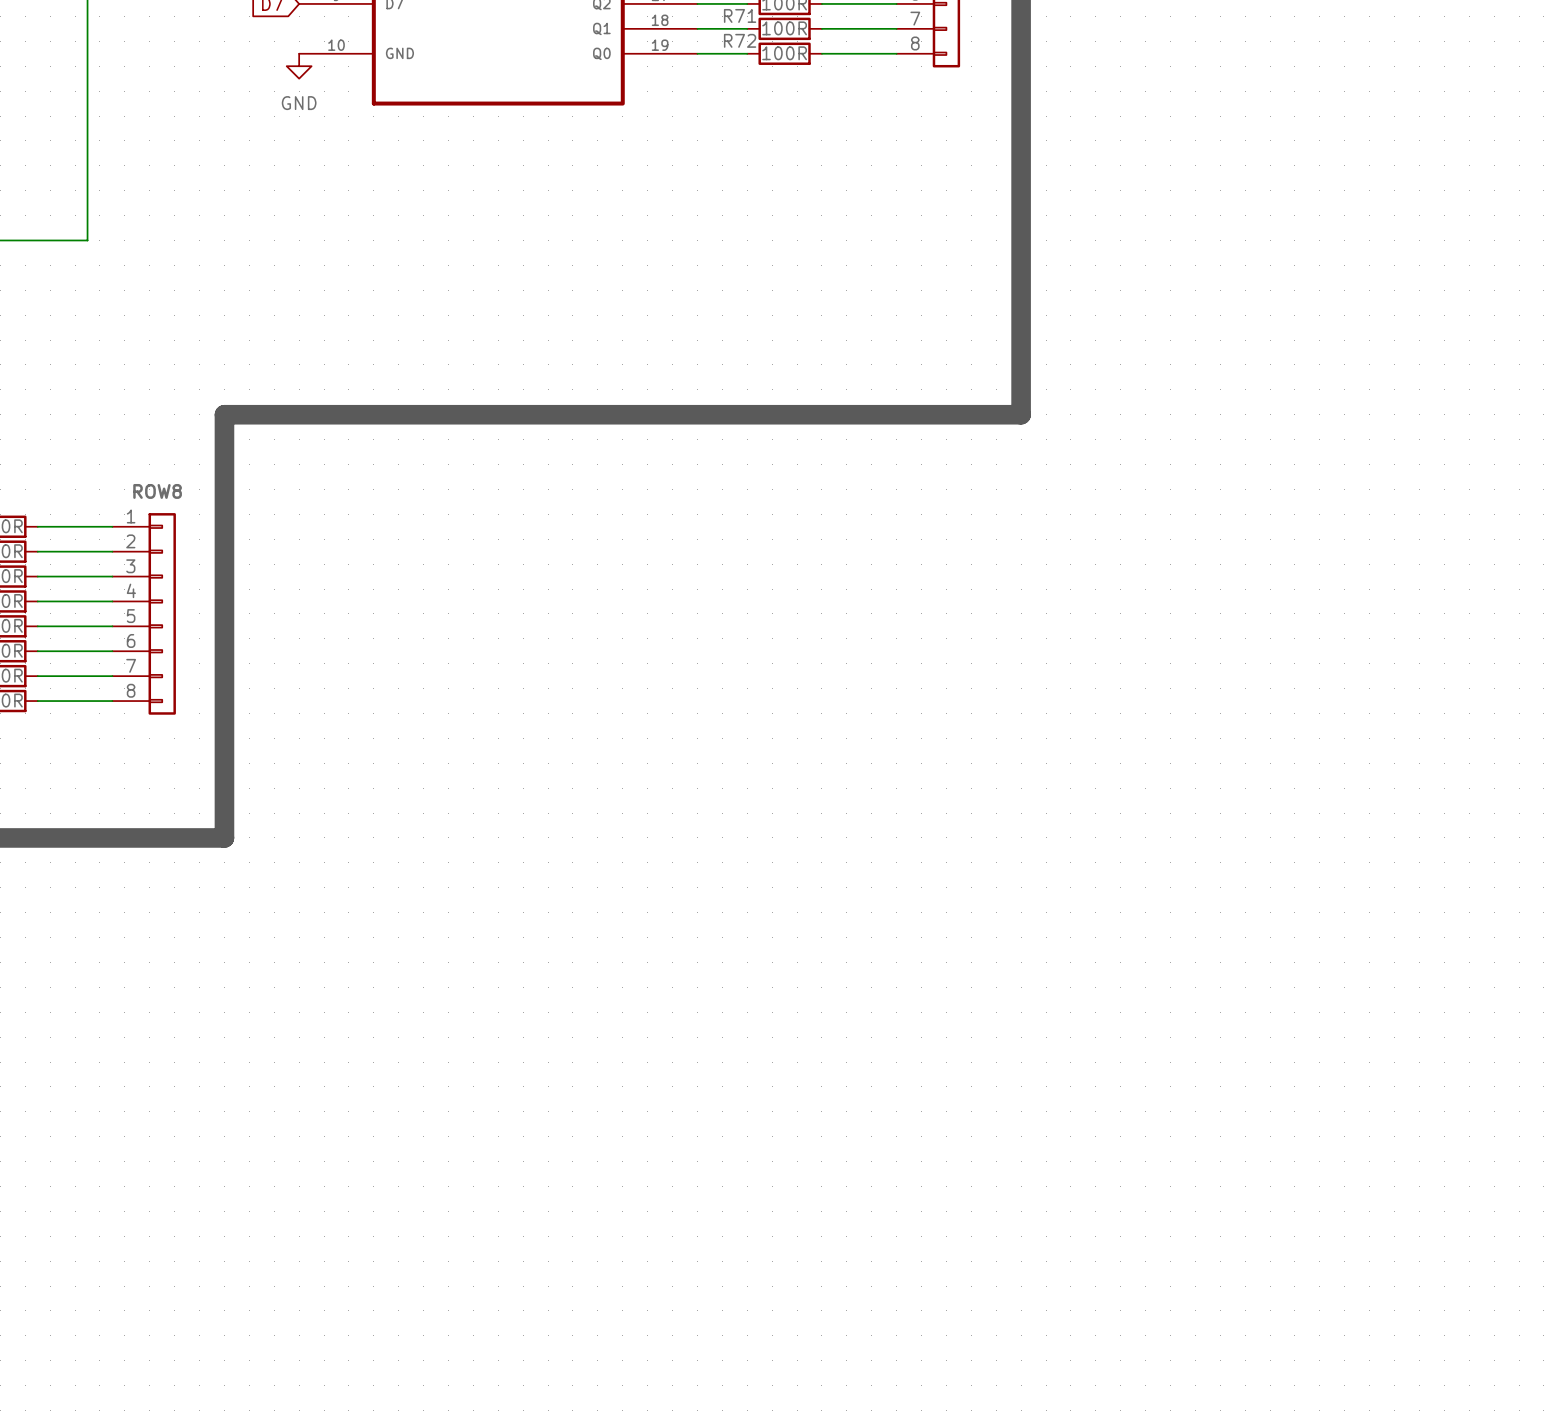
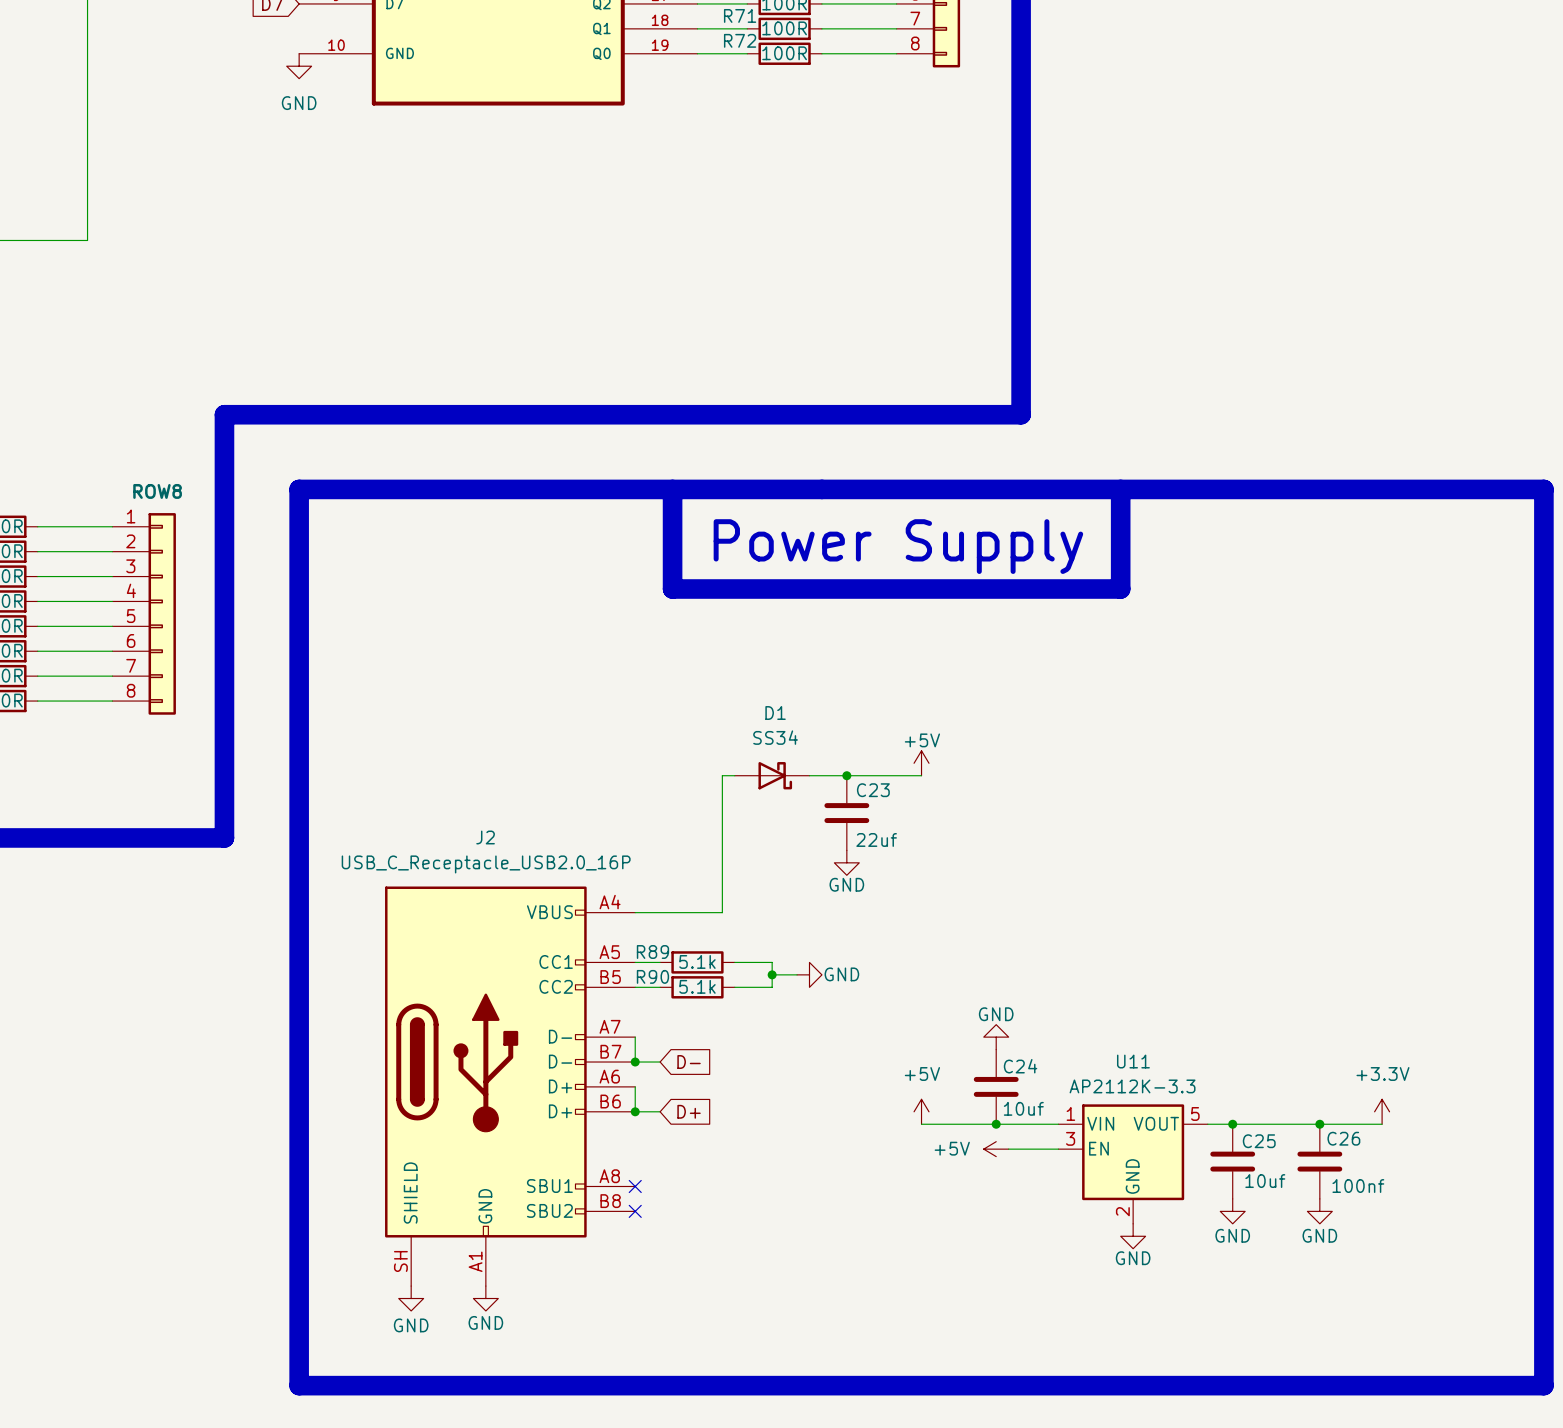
line: none -> (299, 489) (1543, 489) (1543, 1385) (299, 1385) (299, 489)
line: none -> (672, 489) (672, 589) (1120, 589) (1120, 489)
text: none -> Power Supply (898, 546)
power symbol: none -> +5V (921, 763)
wire: none -> (734, 775) (722, 775) (722, 912) (635, 912)
D1: none -> SS34 (772, 775)
wire: none -> (809, 775) (921, 775)
junction: none -> (846, 775)
C23: none -> 22uf (846, 813)
power symbol: none -> GND (846, 862)
wire: none -> (635, 962) (660, 962)
R89: none -> 5.1k (697, 962)
wire: none -> (734, 962) (772, 962) (772, 987) (734, 987)
wire: none -> (772, 974) (797, 974)
junction: none -> (772, 974)
power symbol: none -> GND (809, 974)
wire: none -> (635, 987) (660, 987)
R90: none -> 5.1k (697, 987)
wire: none -> (635, 1037) (635, 1062) (660, 1062)
power symbol: none -> GND (996, 1037)
junction: none -> (635, 1062)
global label: none -> D- (689, 1062)
J2: none -> USB_C_Receptacle_USB2.0_16P (510, 1086)
wire: none -> (635, 1086) (635, 1111) (660, 1111)
C24: none -> 10uf (996, 1086)
junction: none -> (635, 1111)
global label: none -> D+ (689, 1111)
power symbol: none -> +5V (921, 1111)
power symbol: none -> +3.3V (1382, 1111)
wire: none -> (921, 1124) (1058, 1124)
junction: none -> (996, 1124)
wire: none -> (1207, 1124) (1382, 1124)
junction: none -> (1232, 1124)
junction: none -> (1319, 1124)
power symbol: none -> +5V (996, 1149)
wire: none -> (1008, 1149) (1058, 1149)
C25: none -> 10uf (1232, 1161)
C26: none -> 100nf (1319, 1161)
U11: none -> AP2112K-3.3 (1133, 1164)
no-connect mark: none -> (635, 1186)
no-connect mark: none -> (635, 1211)
power symbol: none -> GND (1232, 1211)
power symbol: none -> GND (1319, 1211)
power symbol: none -> GND (1133, 1236)
power symbol: none -> GND (411, 1298)
power symbol: none -> GND (485, 1298)

